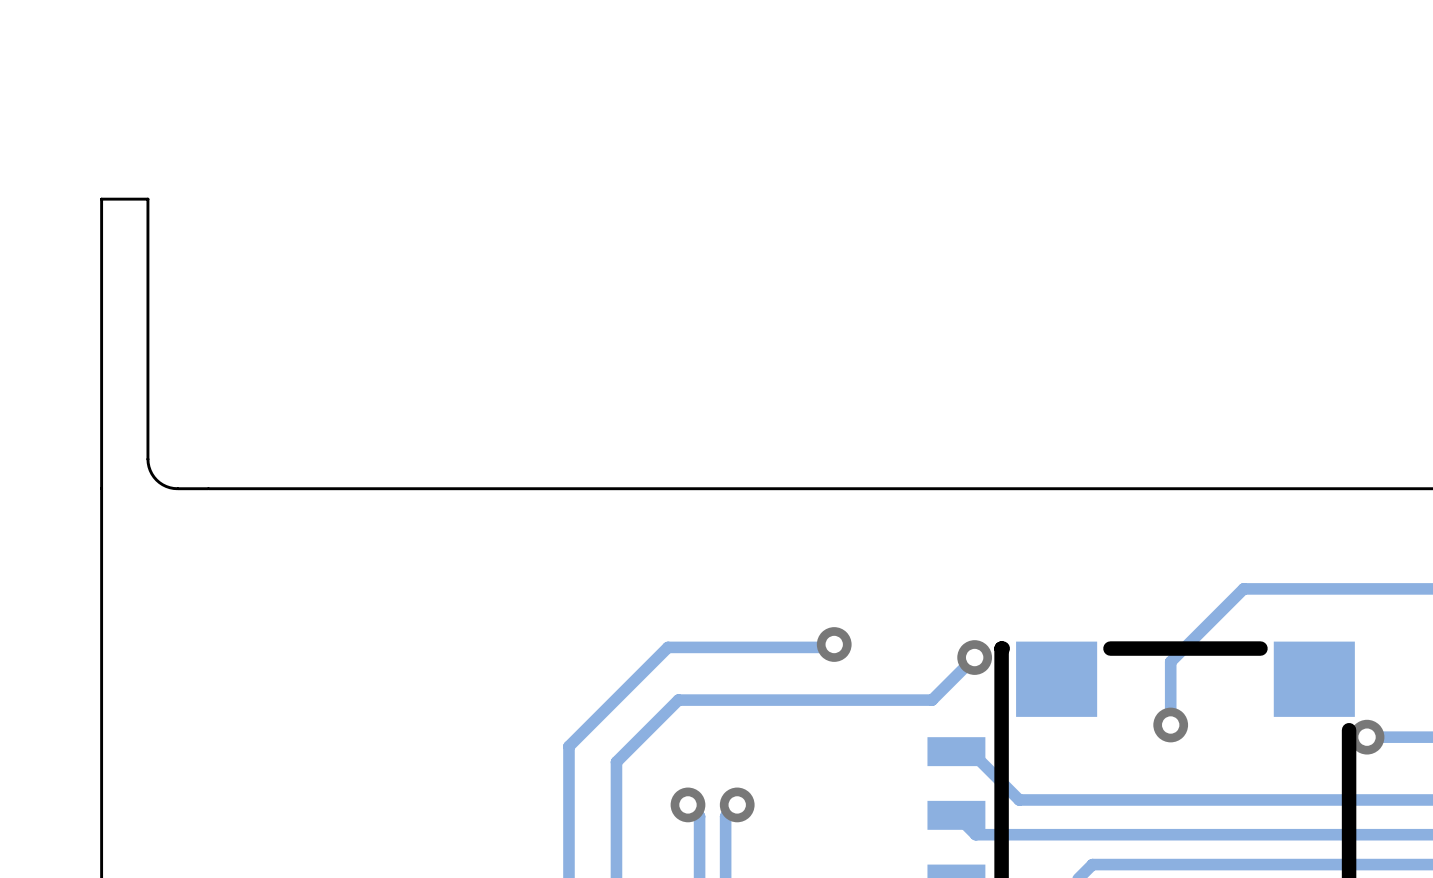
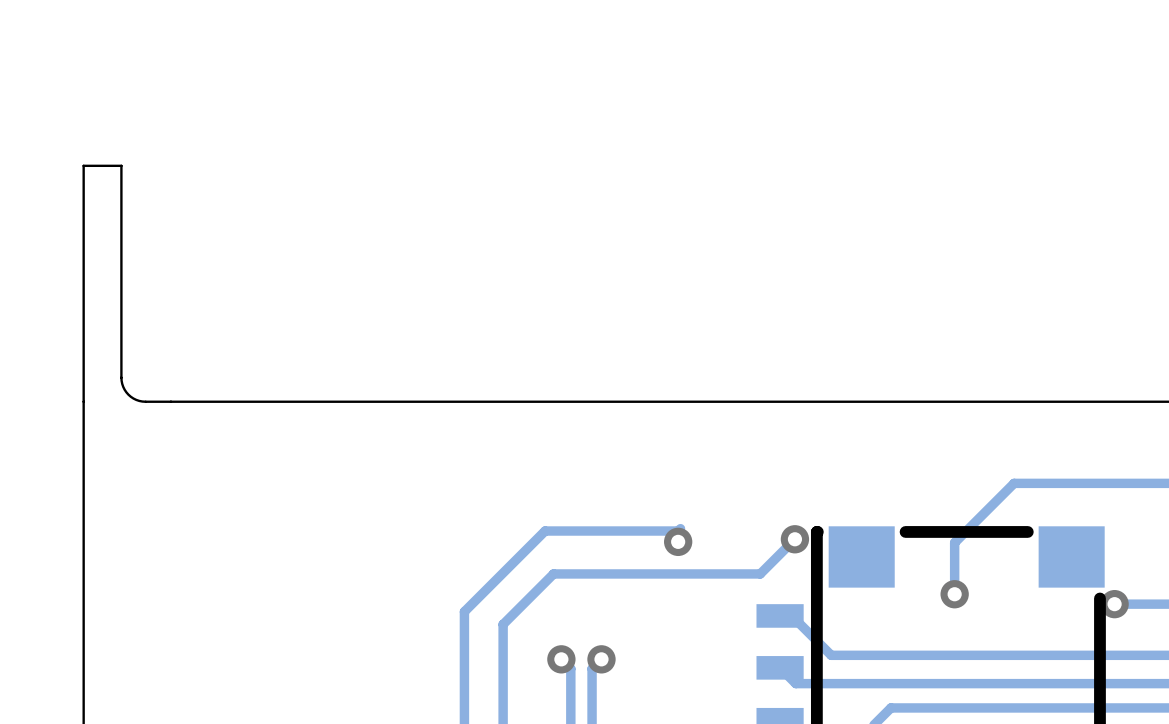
via position: (834, 644) -> (678, 541)

